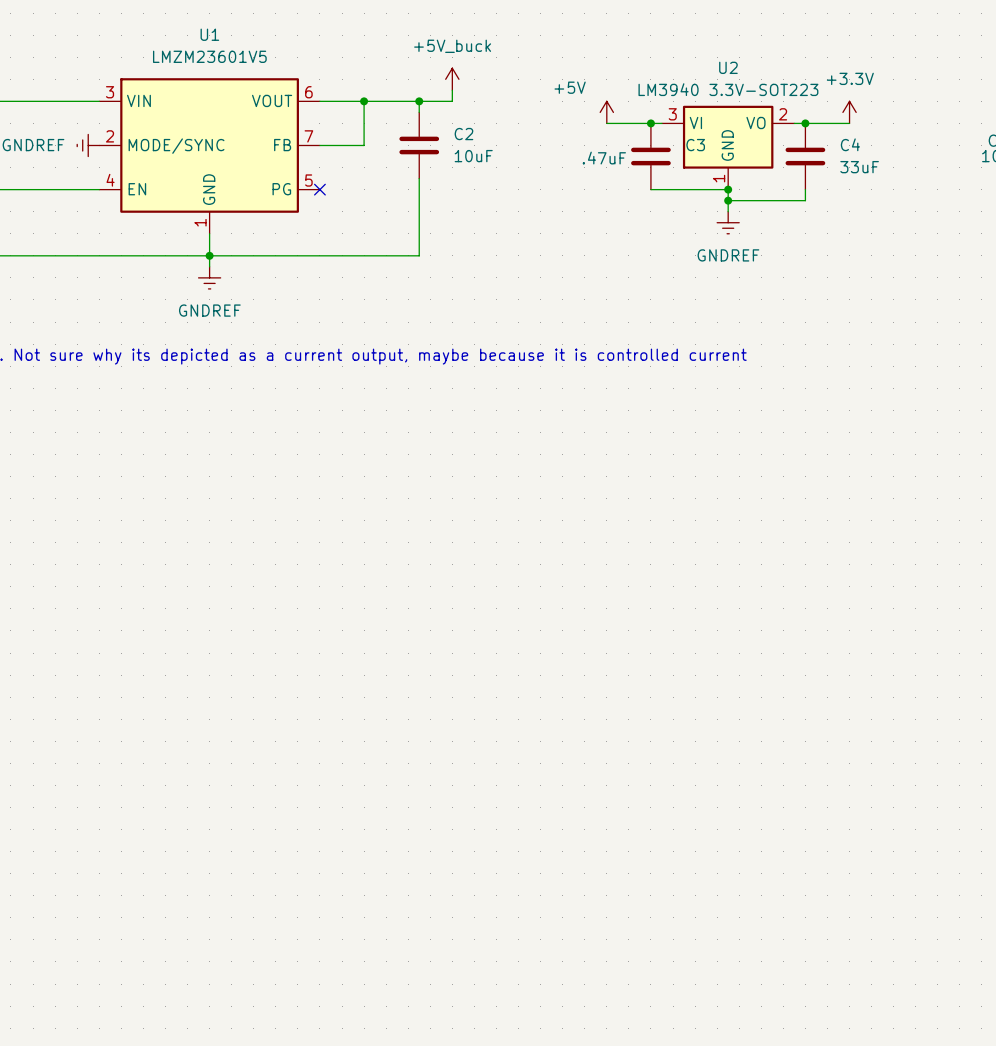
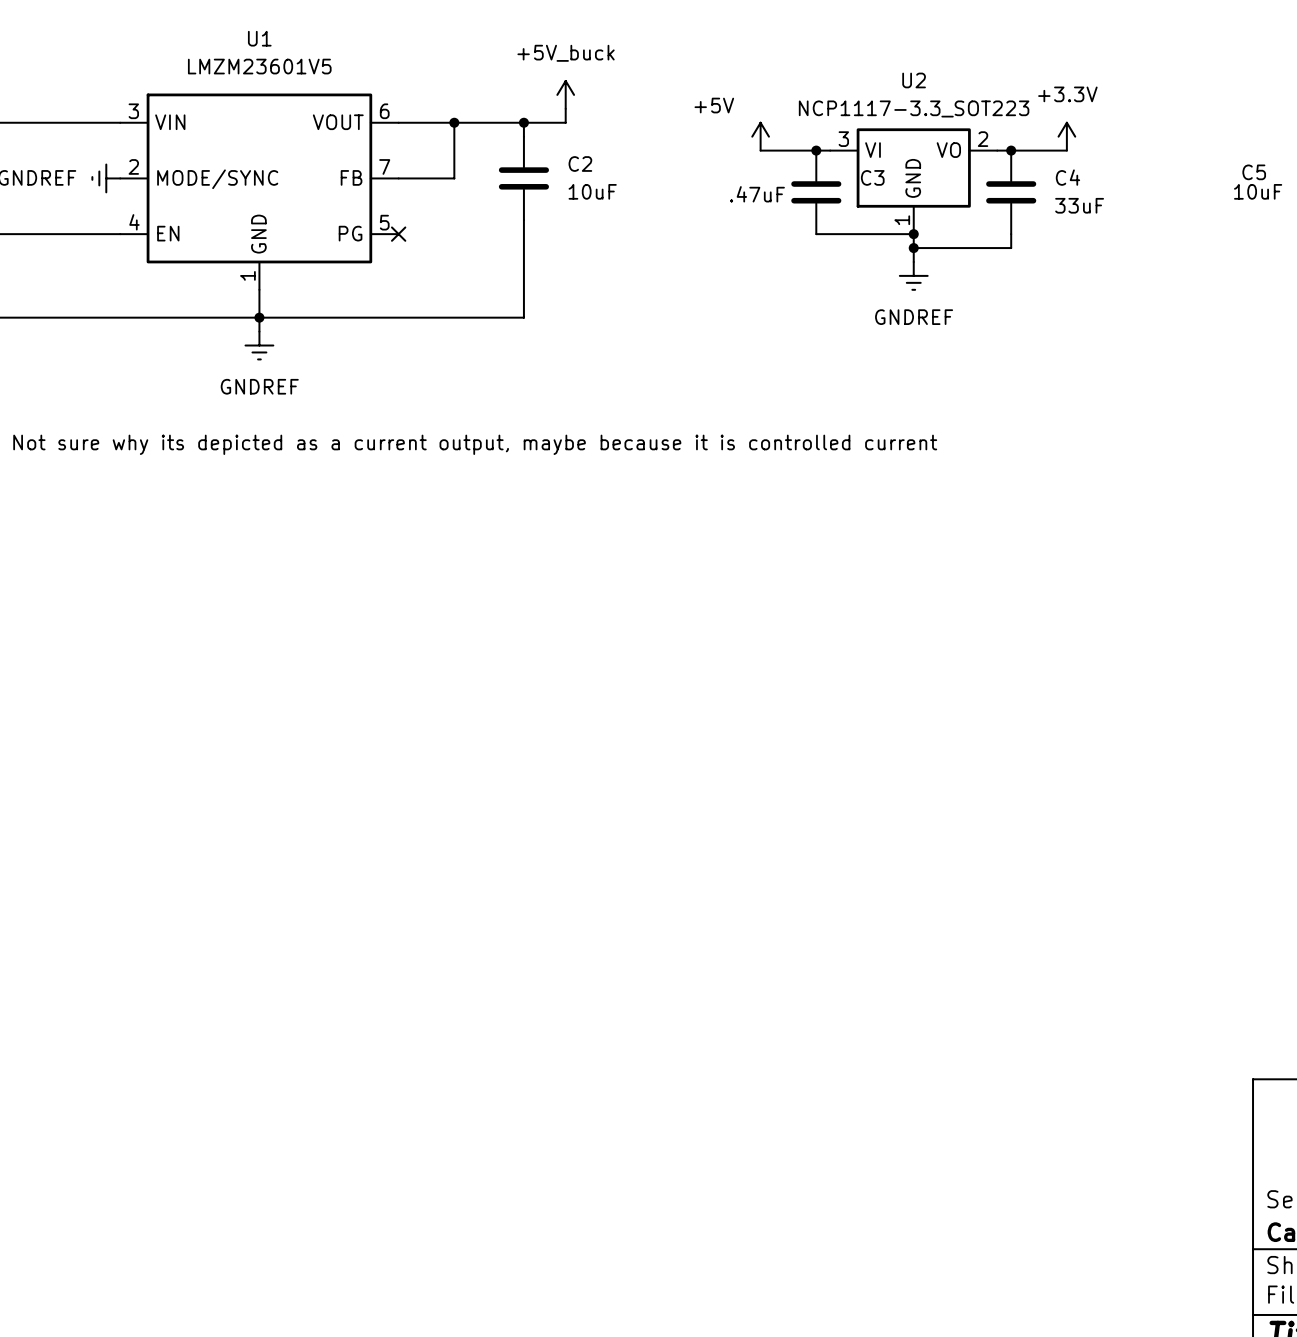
U2 value: LM3940 3.3V-SOT223 (728, 89) -> NCP1117-3.3_SOT223 (914, 108)

